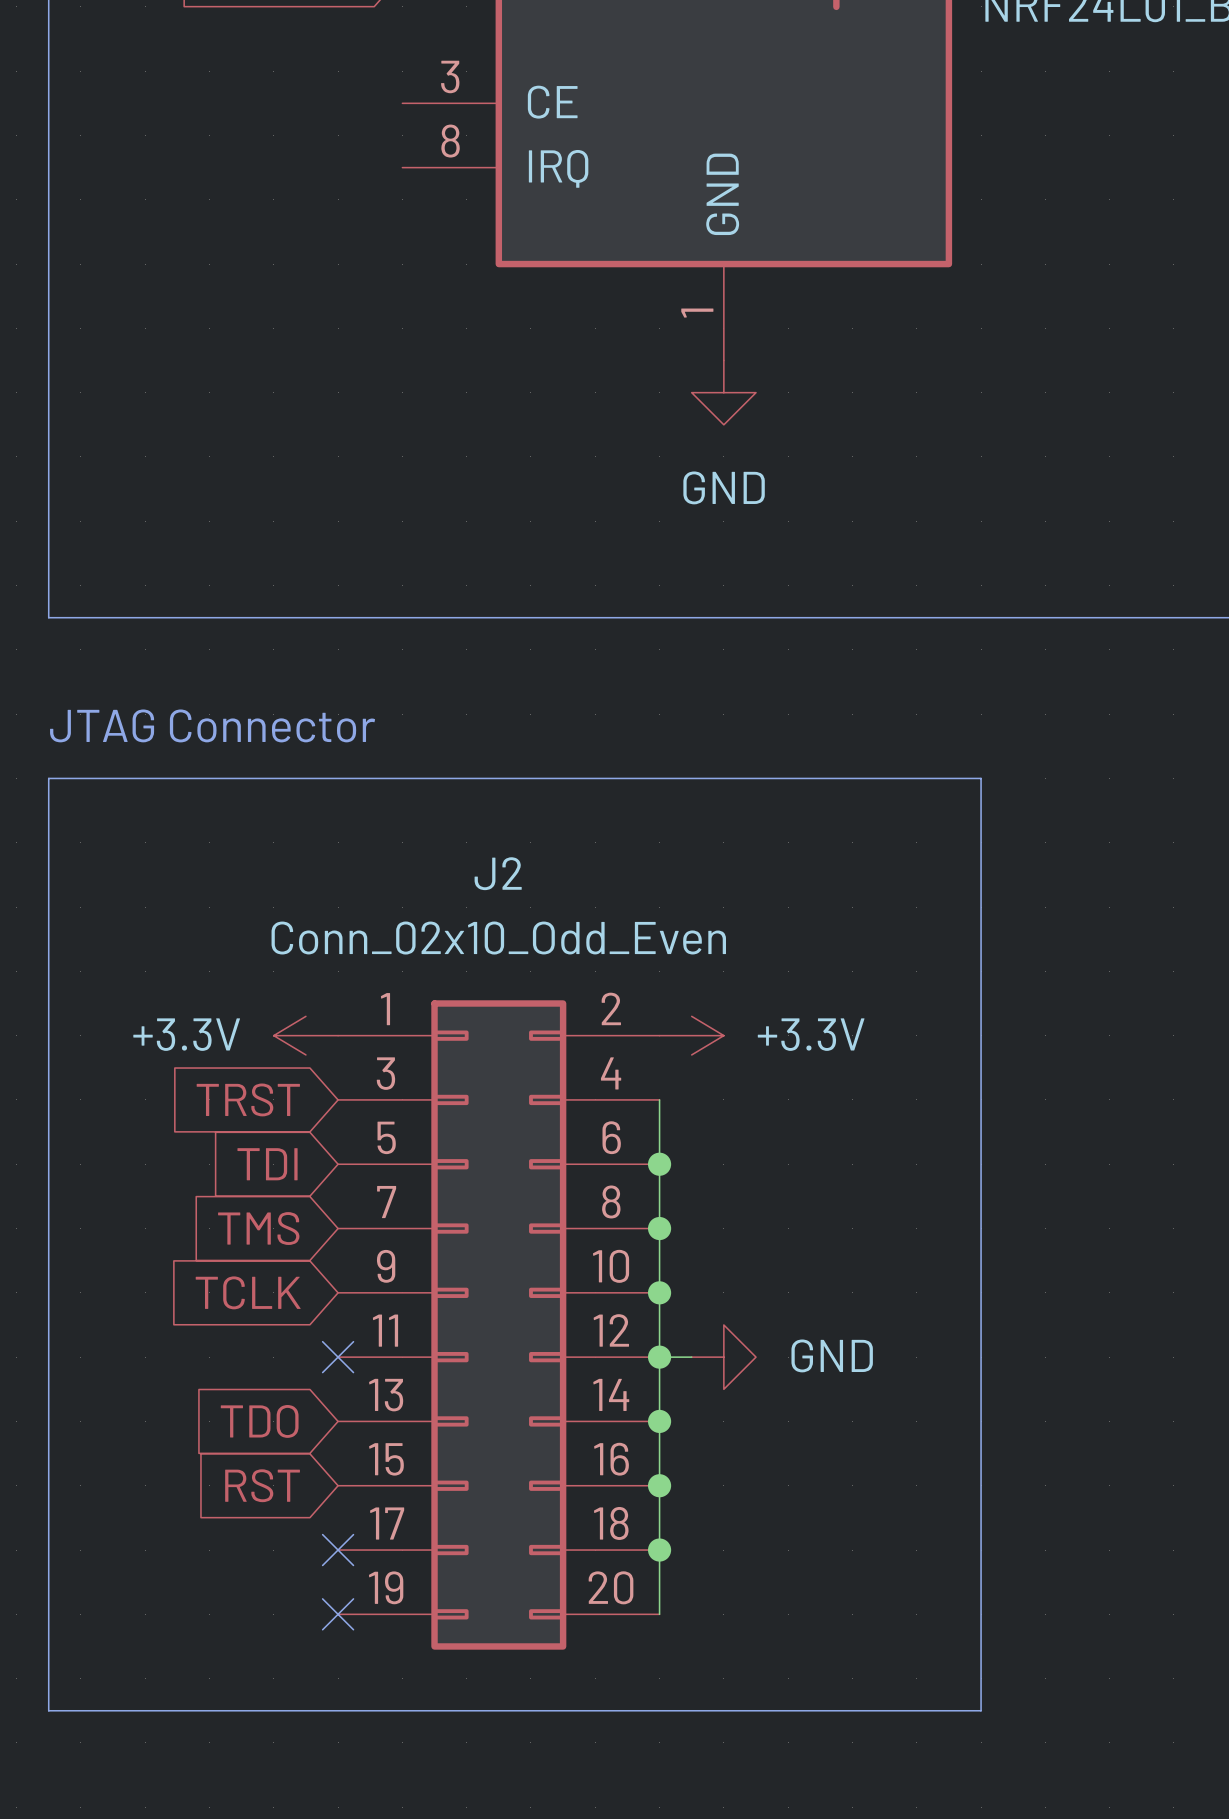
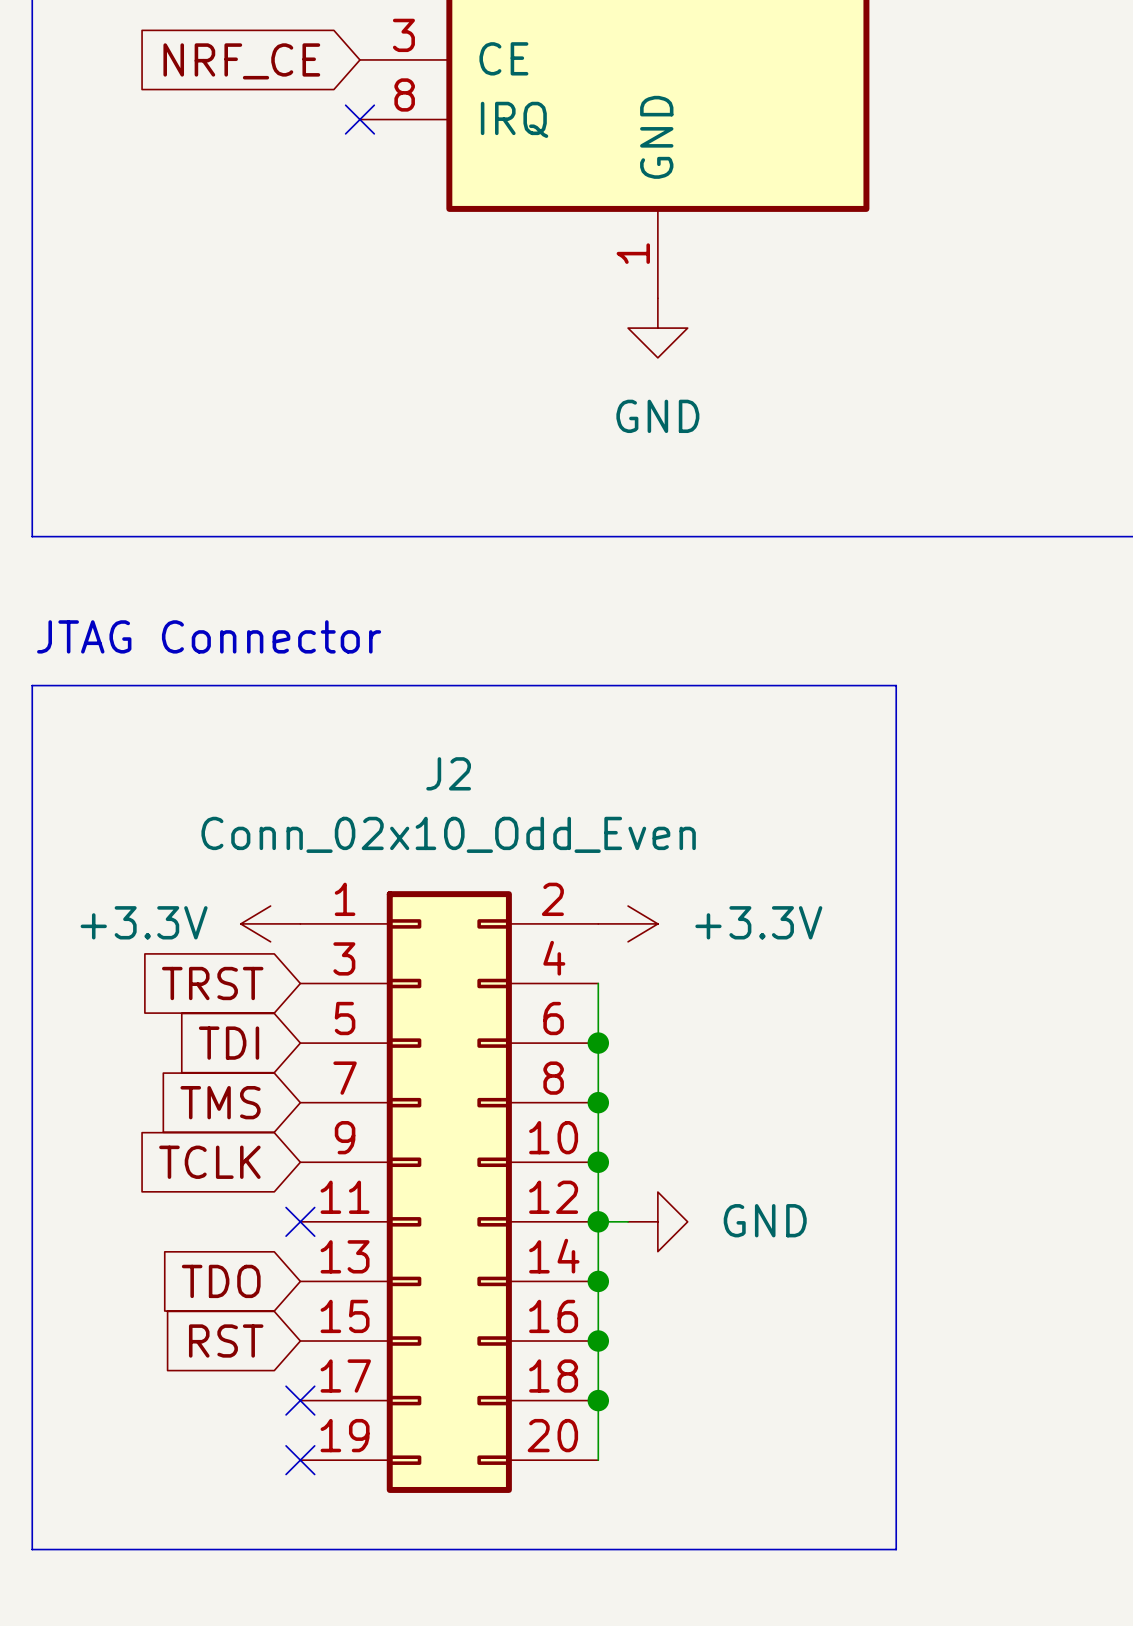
global label: none -> NRF_CE (241, 61)
no-connect mark: none -> (359, 119)

